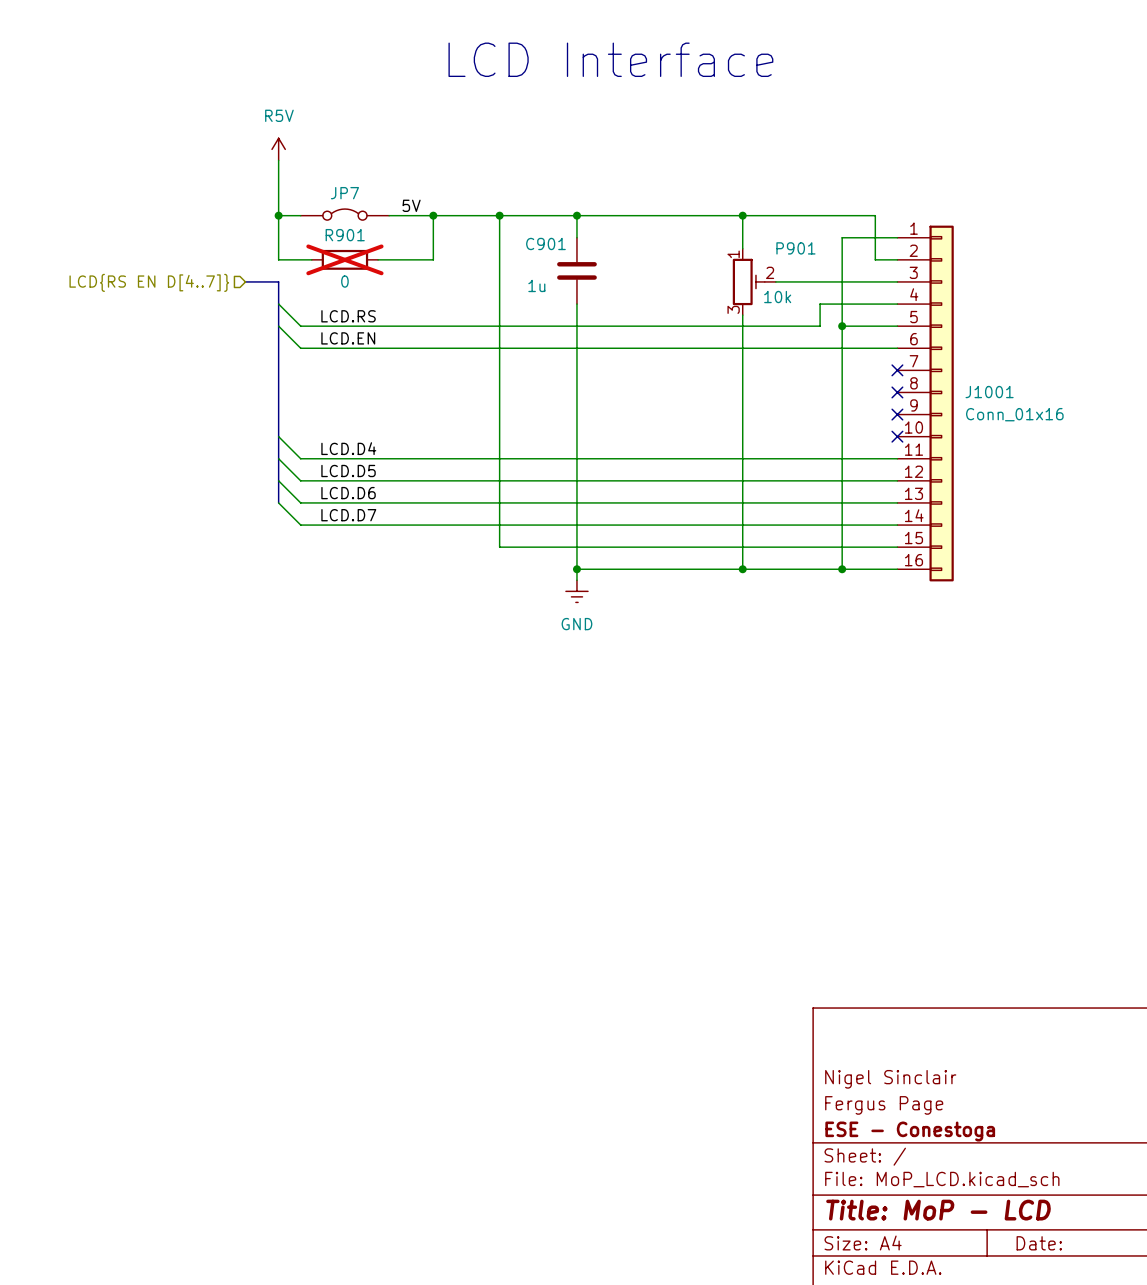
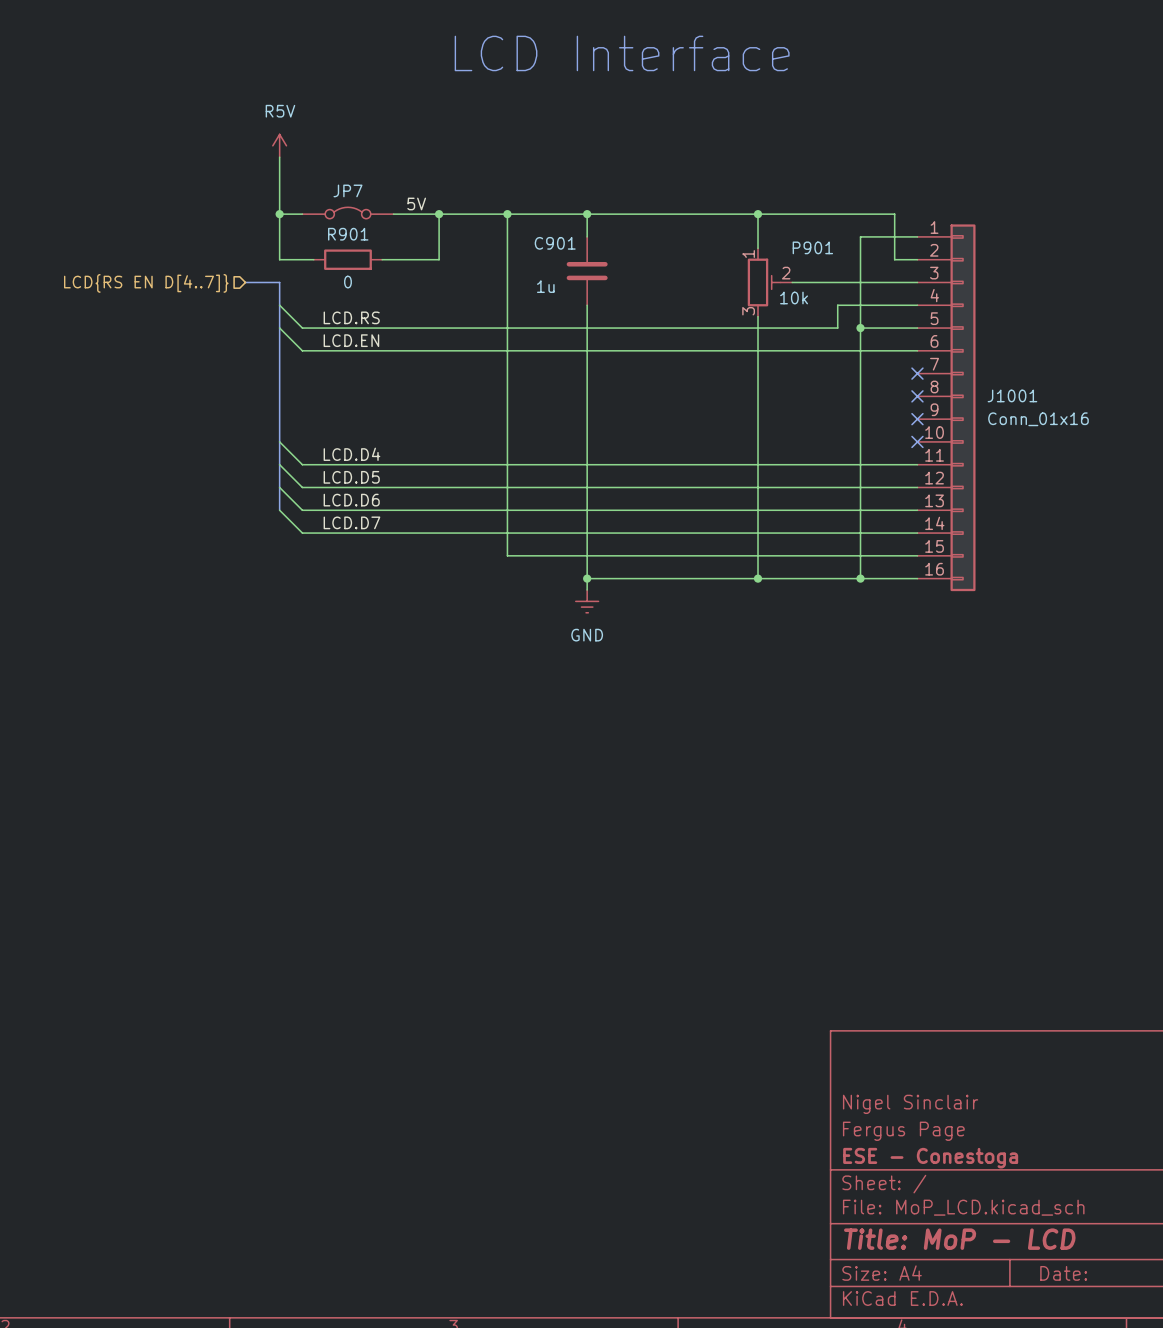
R901 do-not-place cross: (344, 259) -> none

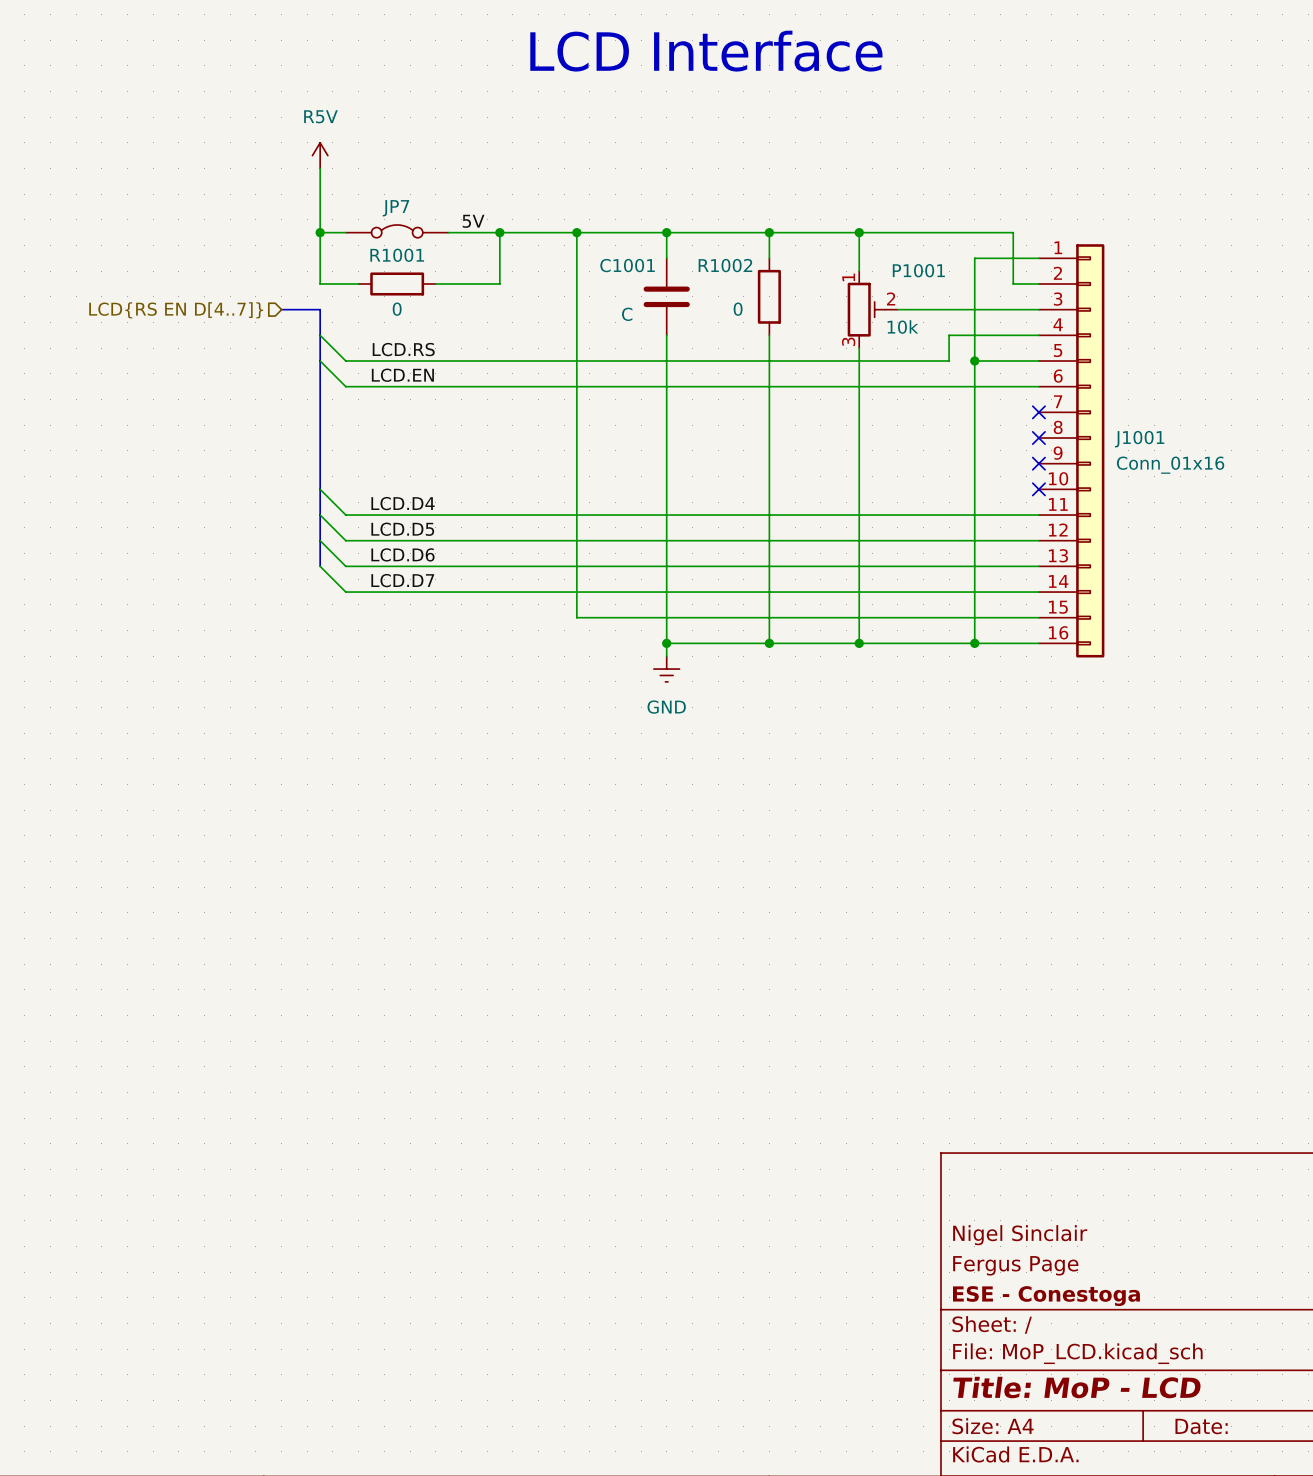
wire: none -> (769, 232) (769, 258)
junction: none -> (769, 232)
R901 name: R901 (348, 234) -> R1001 (397, 255)
C901 name: C901 (555, 243) -> C1001 (627, 265)
P901 name: P901 (812, 247) -> P1001 (918, 270)
R1002: none -> 0 (769, 296)
C901 value: 1u (545, 286) -> C (627, 314)
wire: none -> (769, 335) (769, 643)
junction: none -> (769, 643)

